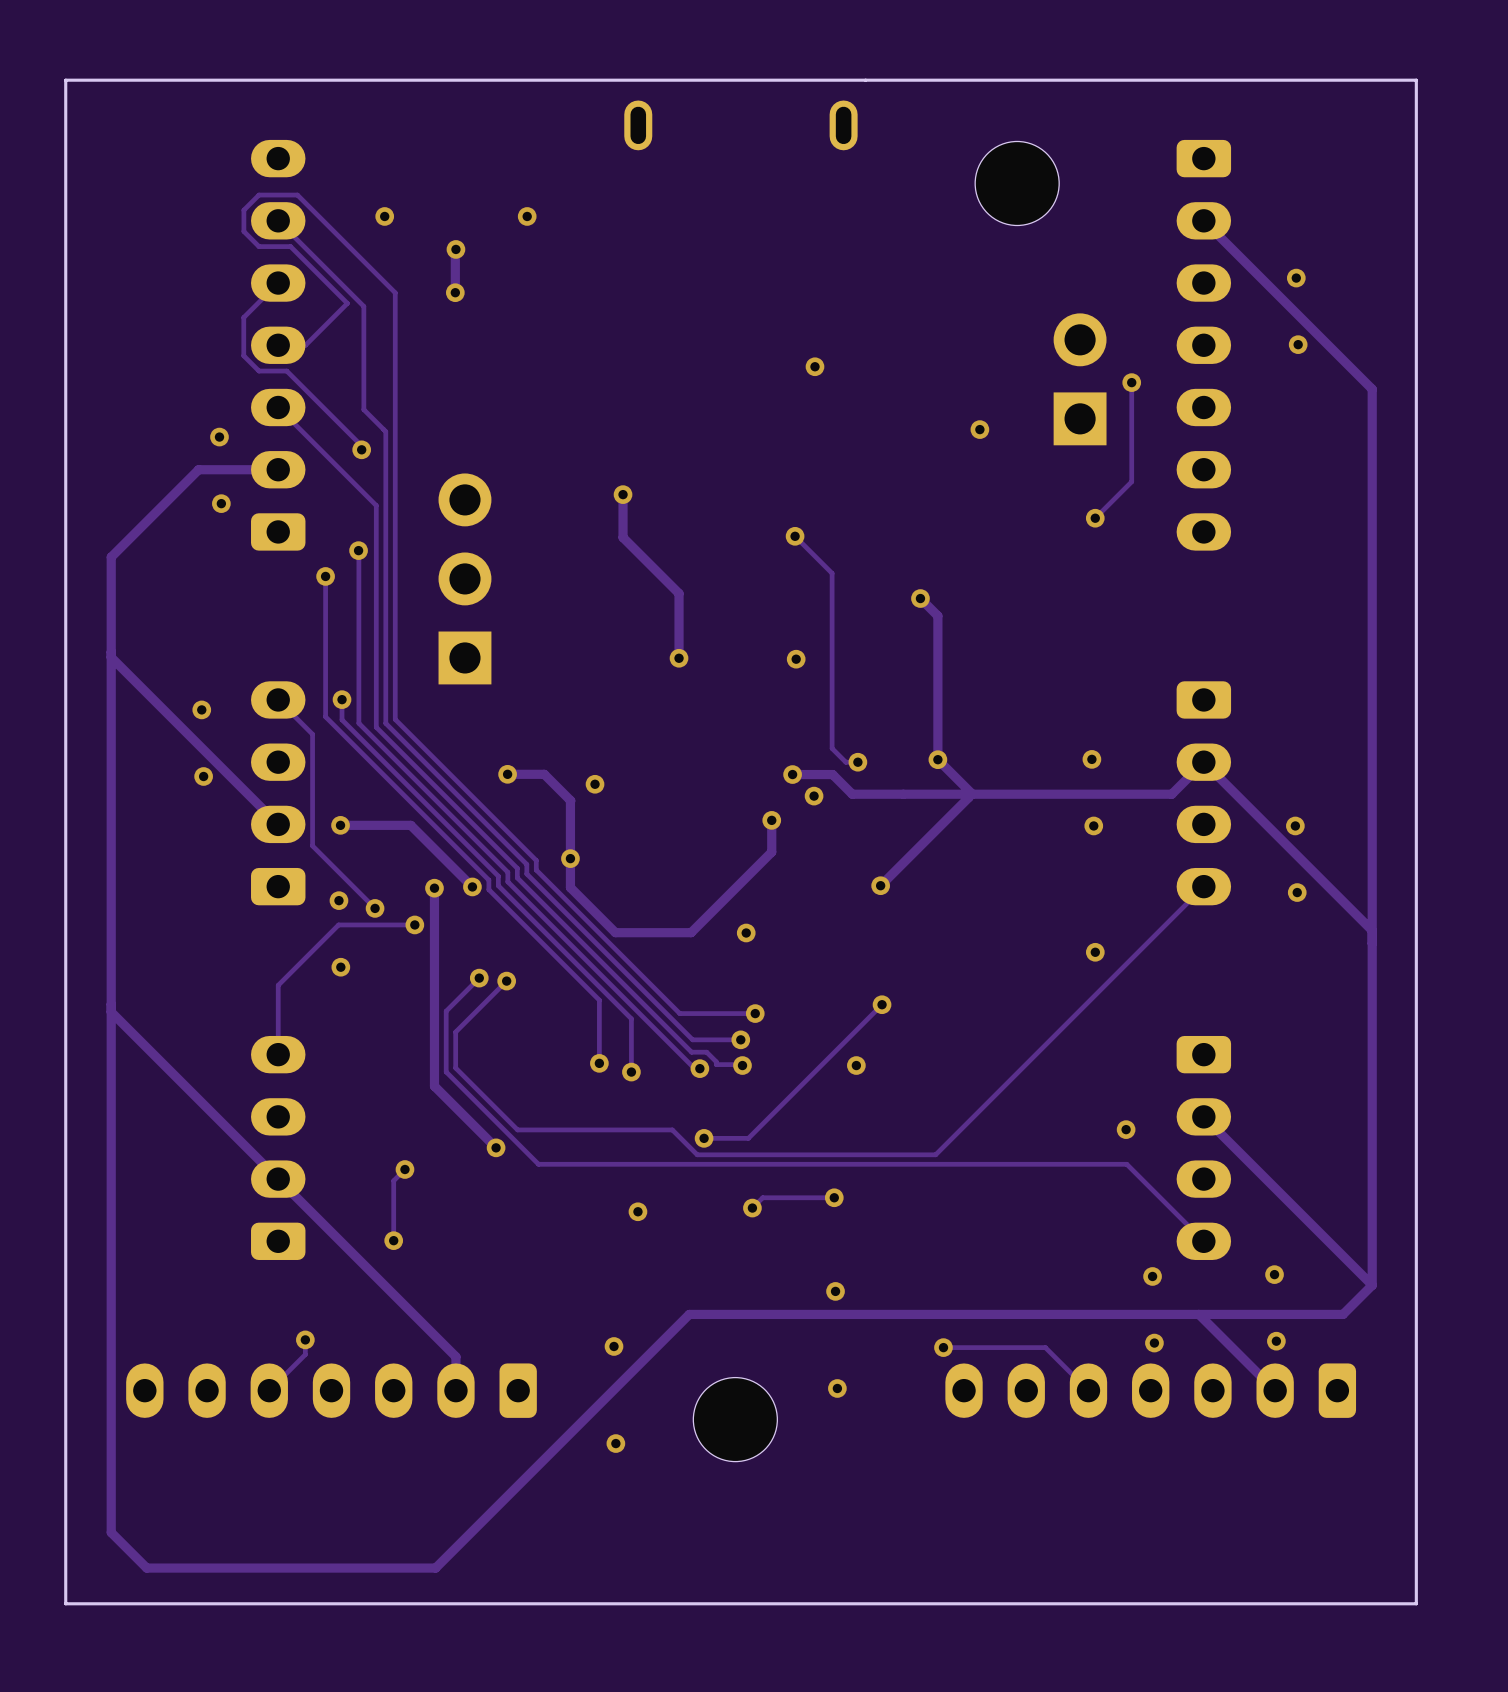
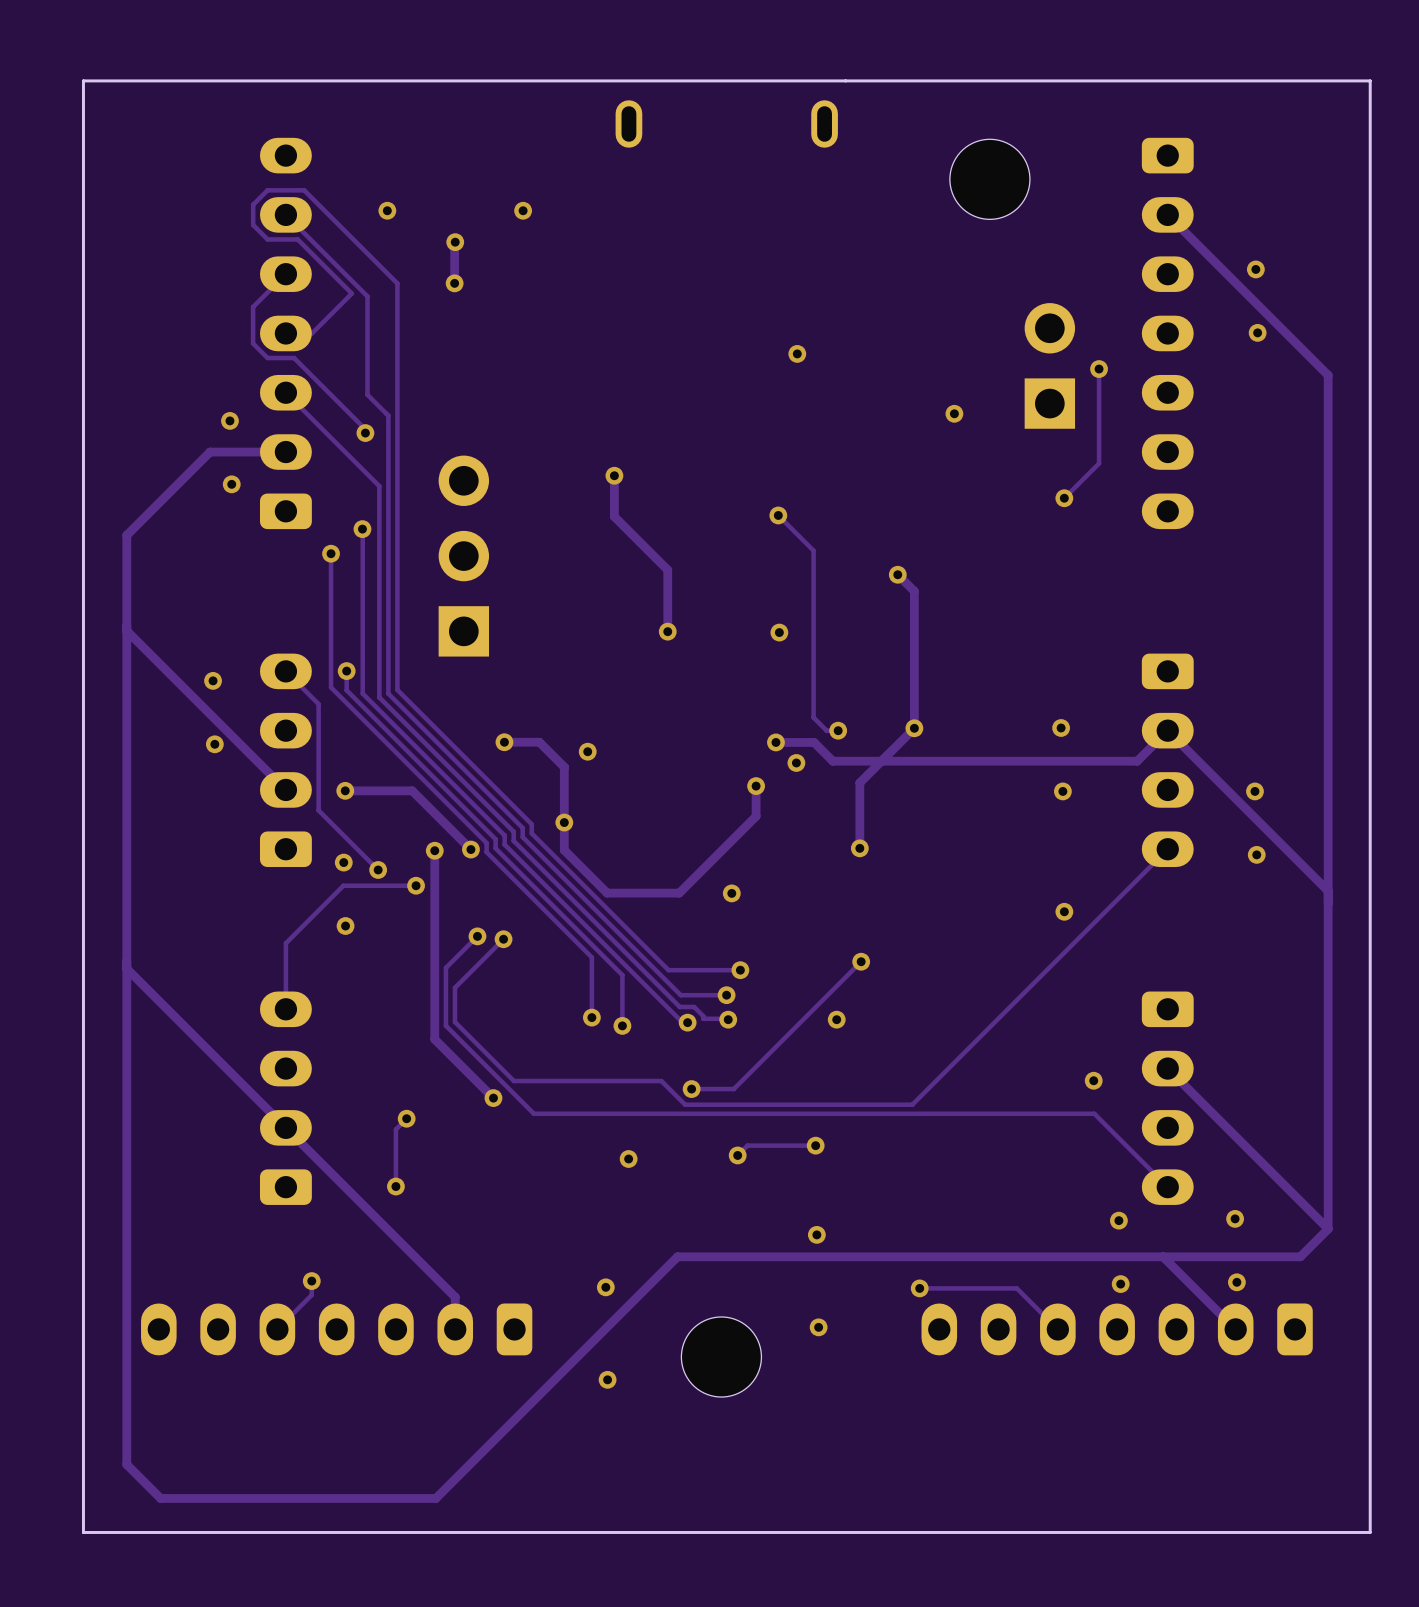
track: (937, 759) (972, 793) -> none
track: (969, 794) (969, 797) (880, 885) -> (914, 728) (859, 782) (859, 848)

